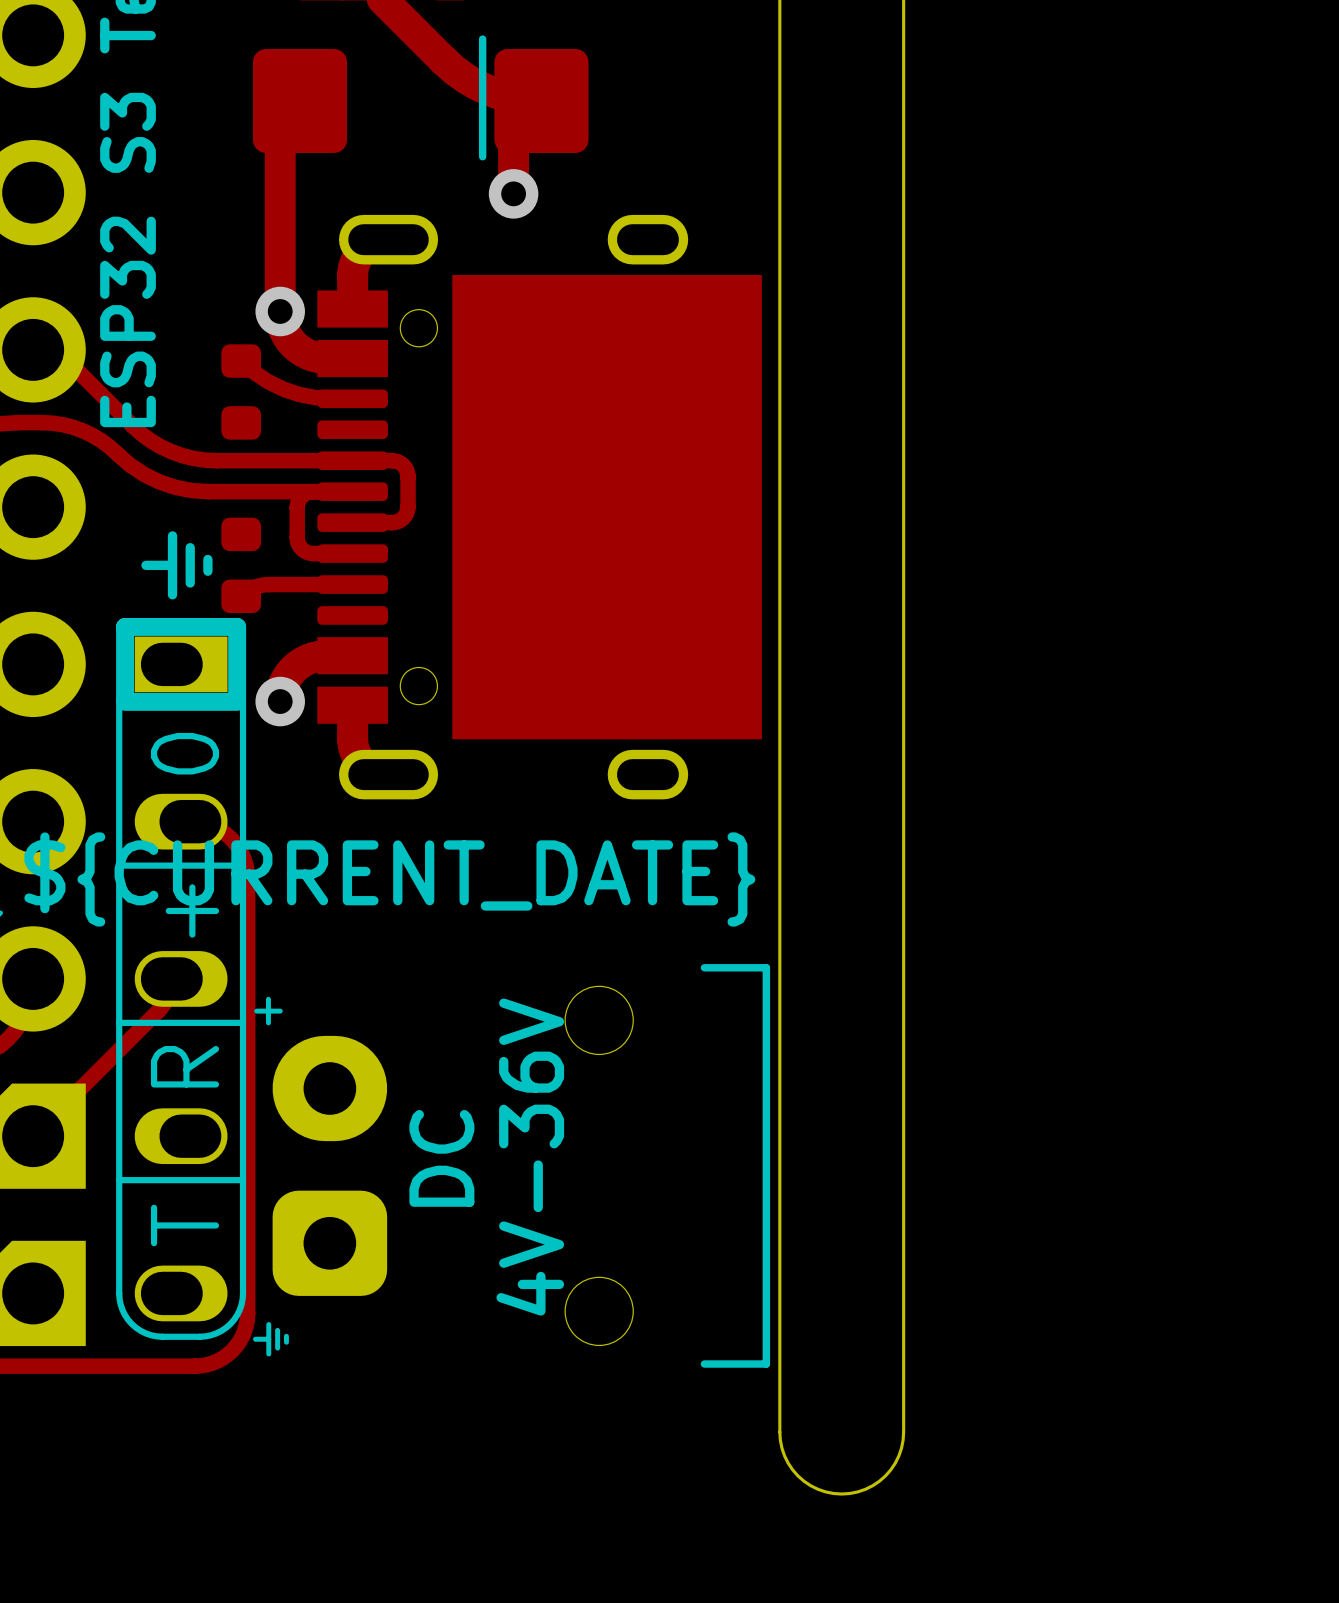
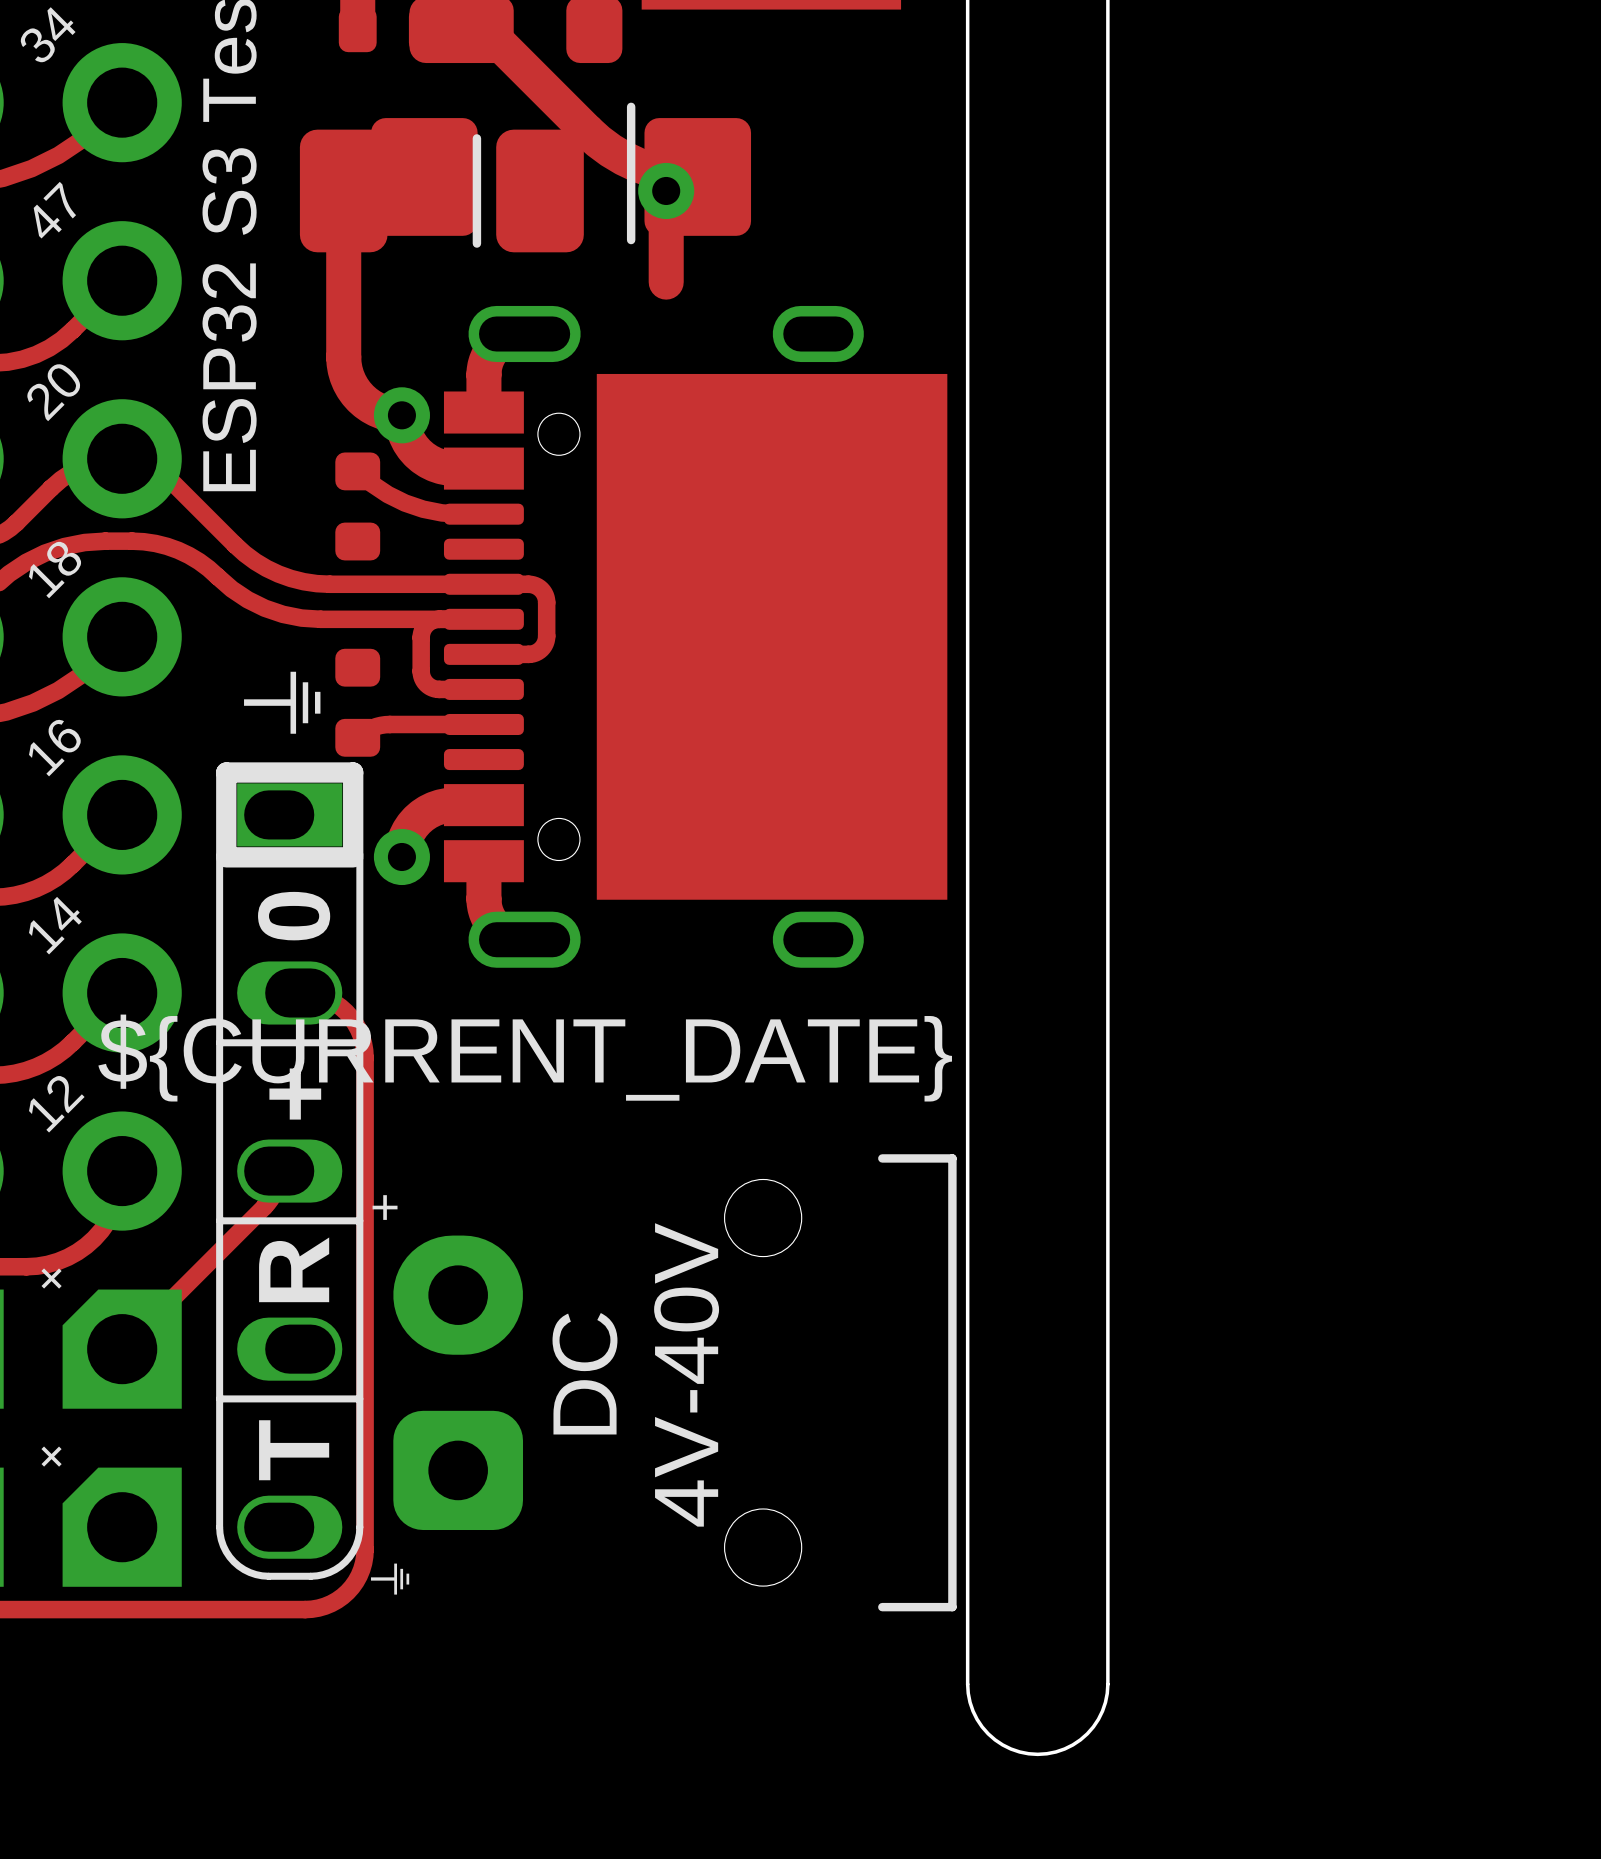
track: (300, 100) (289, 114) (280, 139) (280, 311) -> (343, 190) (345, 370) (352, 388) (365, 402) (382, 412) (401, 415)
part: none -> (441, 190)
via position: (513, 193) -> (666, 190)
text: 4V-36V (530, 1157) -> 4V-40V (686, 1374)

